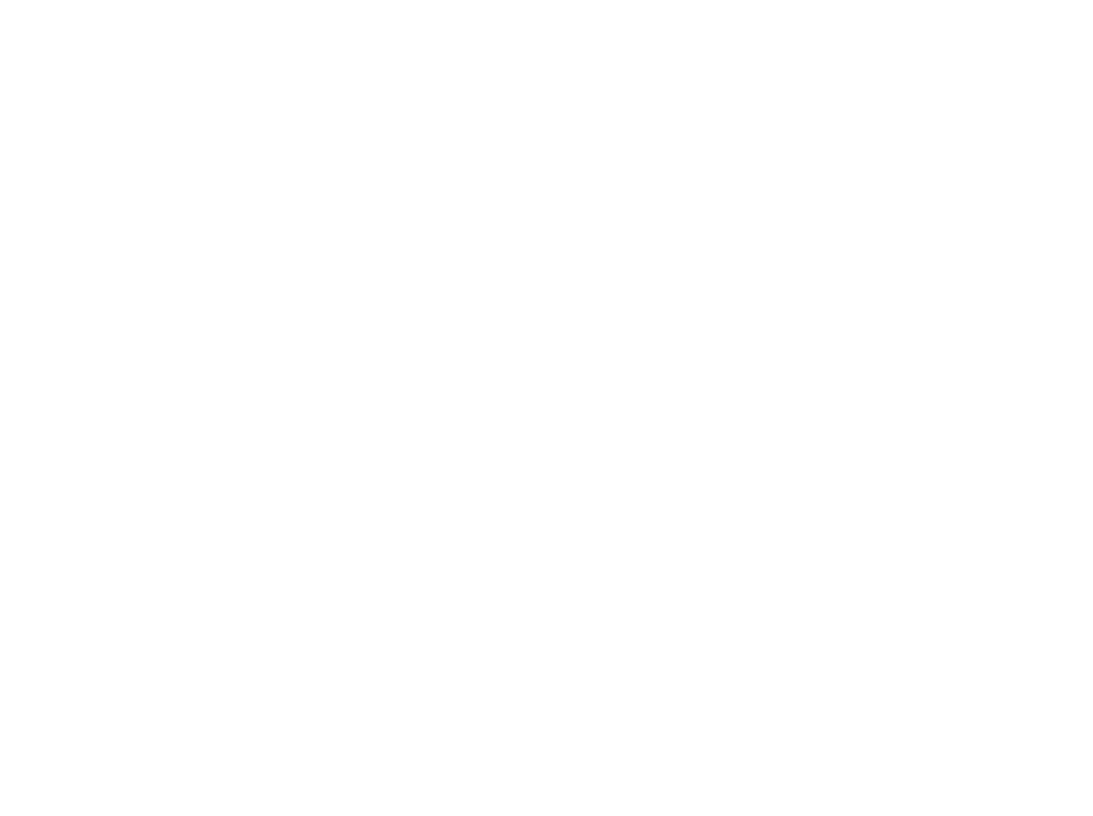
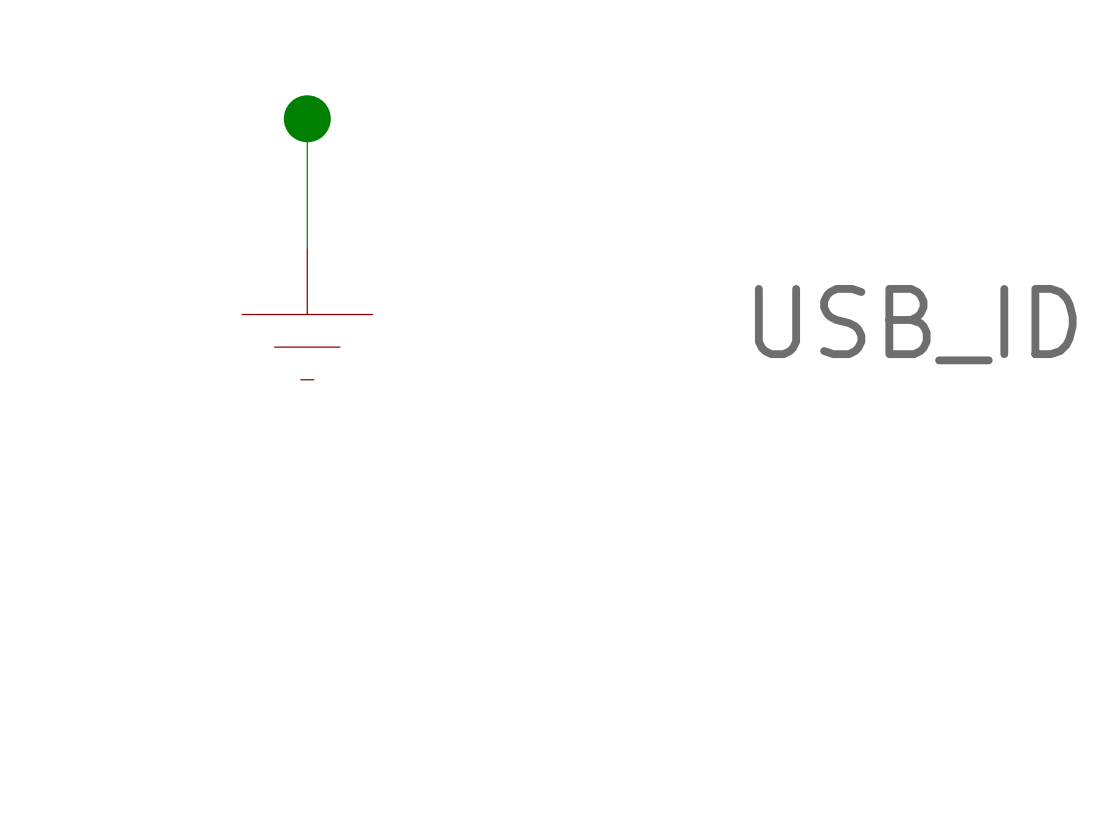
wire: none -> (307, 118) (307, 249)
junction: none -> (307, 118)
power symbol: none -> (307, 314)
label: none -> USB_ID (915, 324)

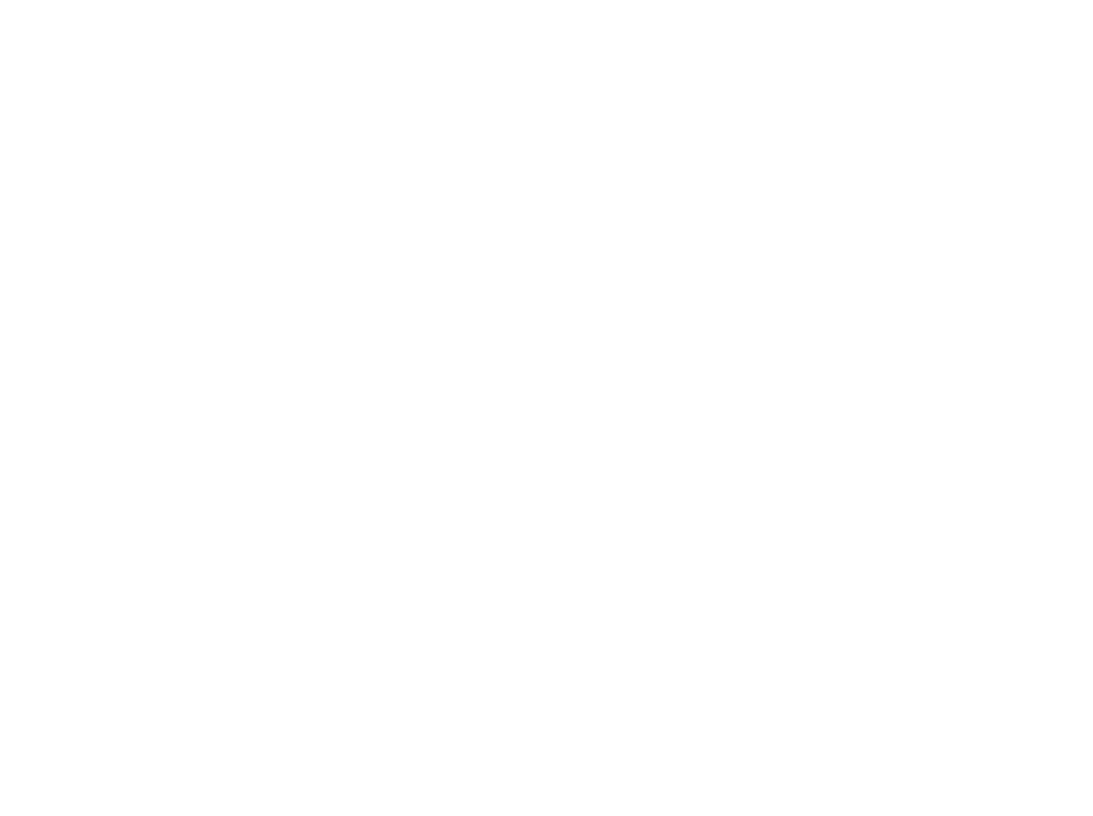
wire: (307, 118) (307, 249) -> none
junction: (307, 118) -> none
power symbol: (307, 314) -> none
label: USB_ID (915, 324) -> none

